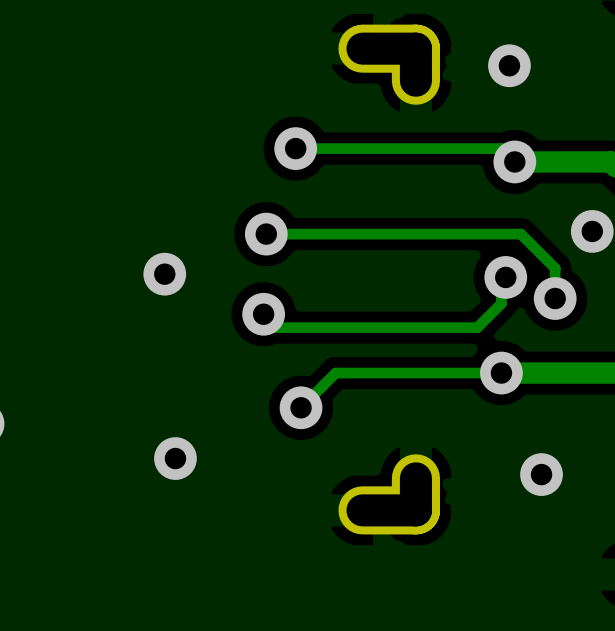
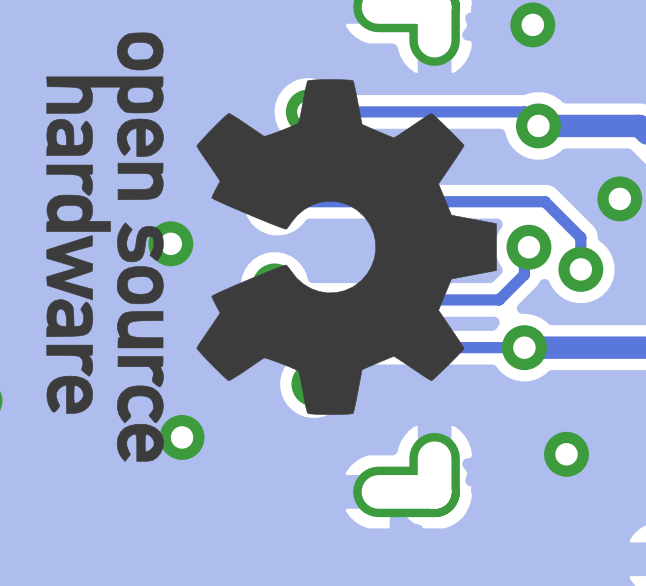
drawing: none -> [46, 32, 497, 462]

